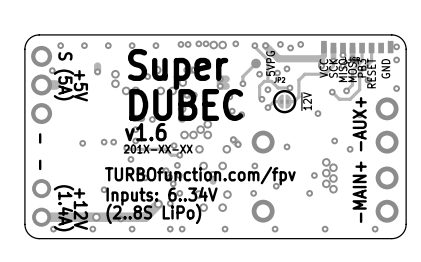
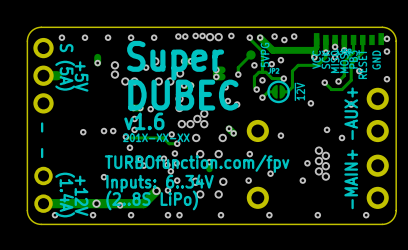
via: (52, 70) -> none

